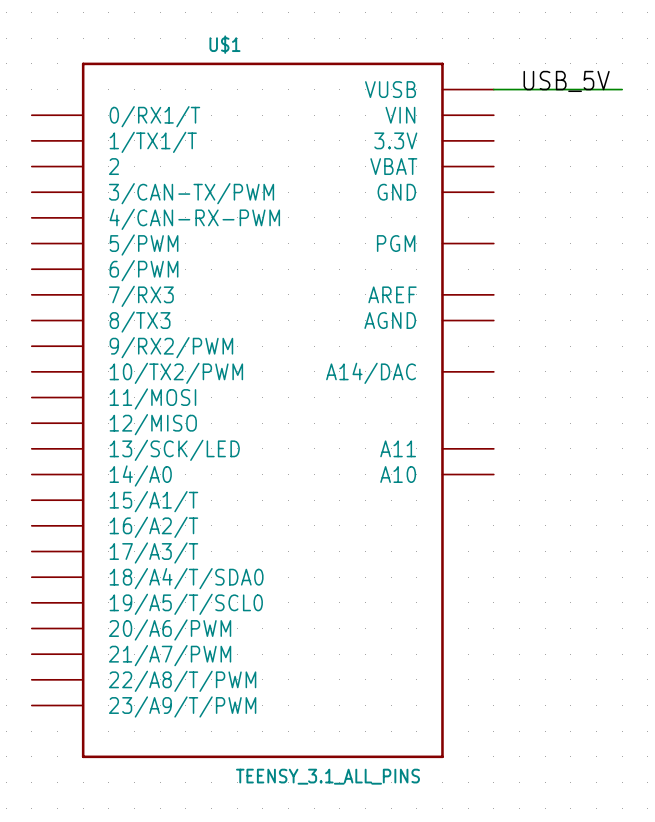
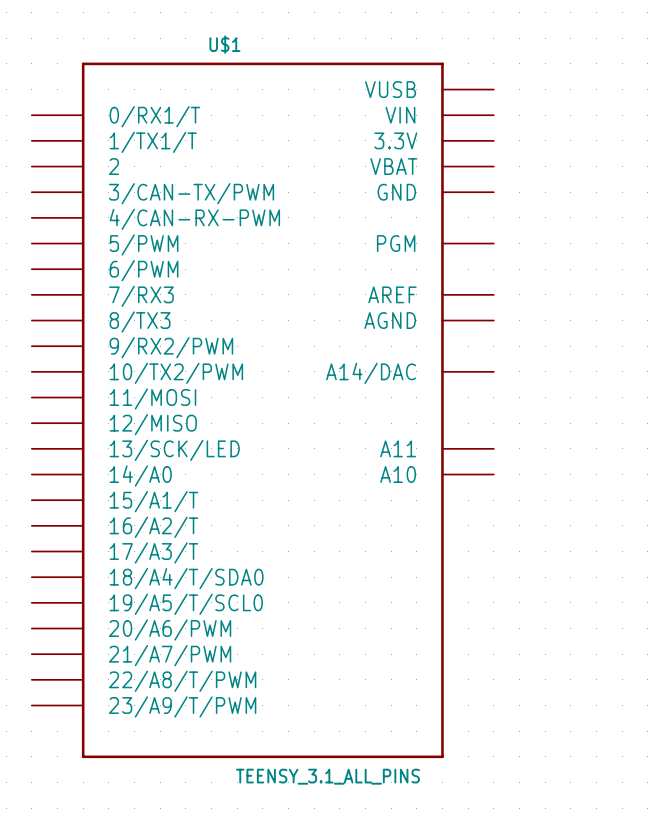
label: USB_5V (566, 81) -> none
wire: (493, 89) (622, 89) -> none

